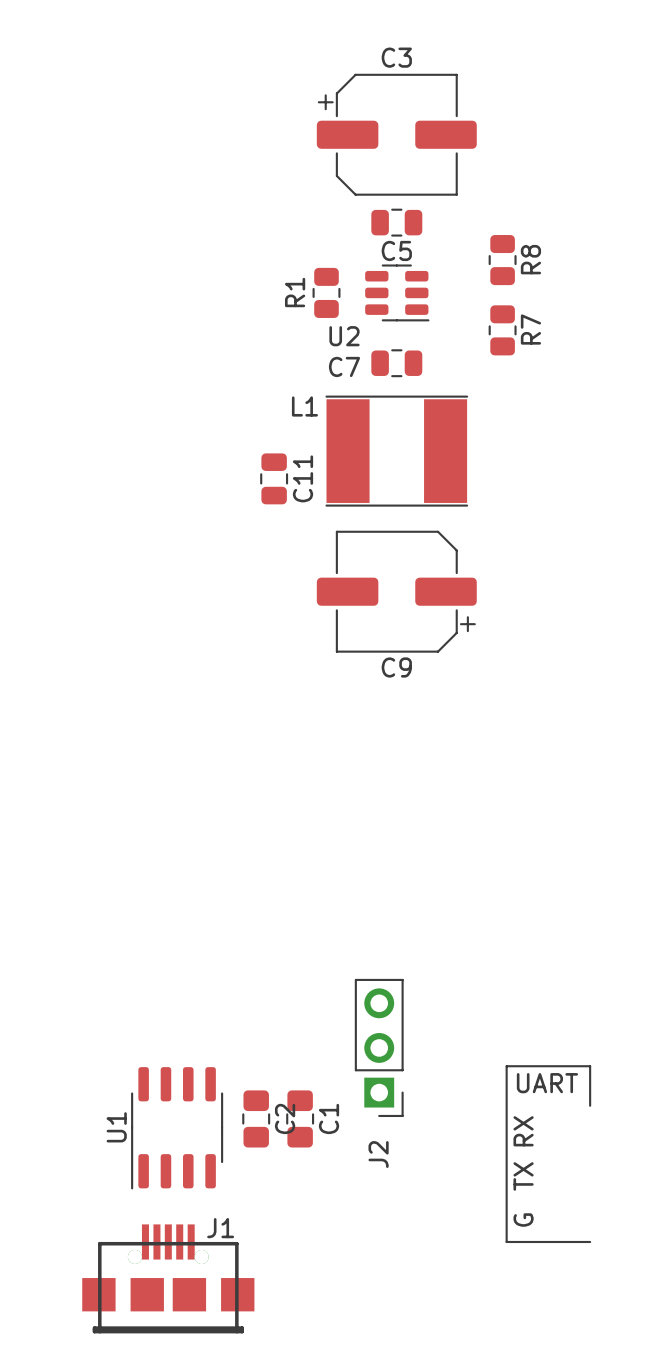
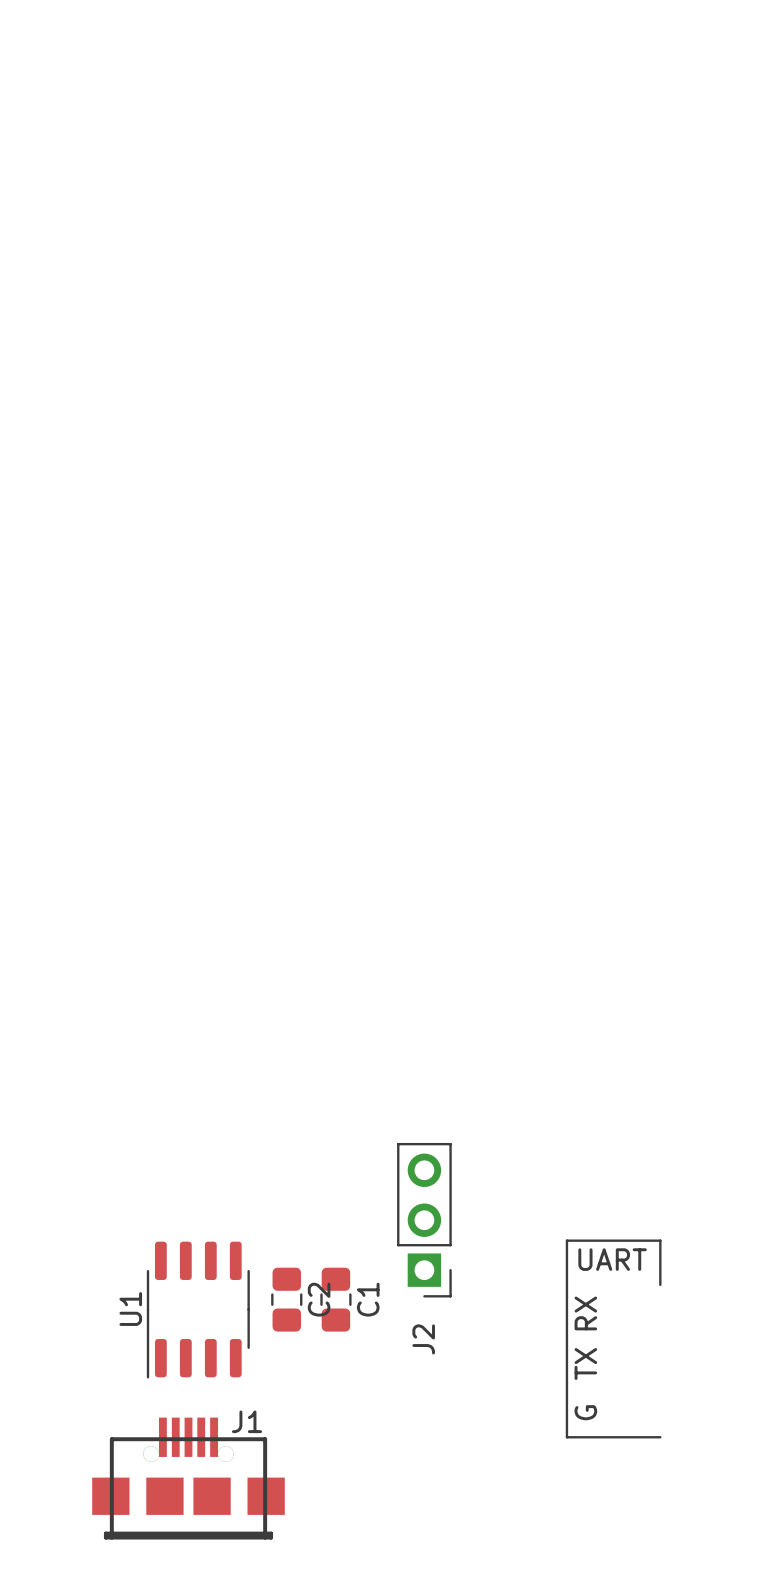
C3: (396, 134) -> none
C5: (396, 222) -> none
R8: (502, 260) -> none
R1: (326, 292) -> none
U2: (397, 292) -> none
R7: (502, 330) -> none
C7: (396, 363) -> none
L1: (396, 451) -> none
C11: (274, 478) -> none
C9: (396, 591) -> none

